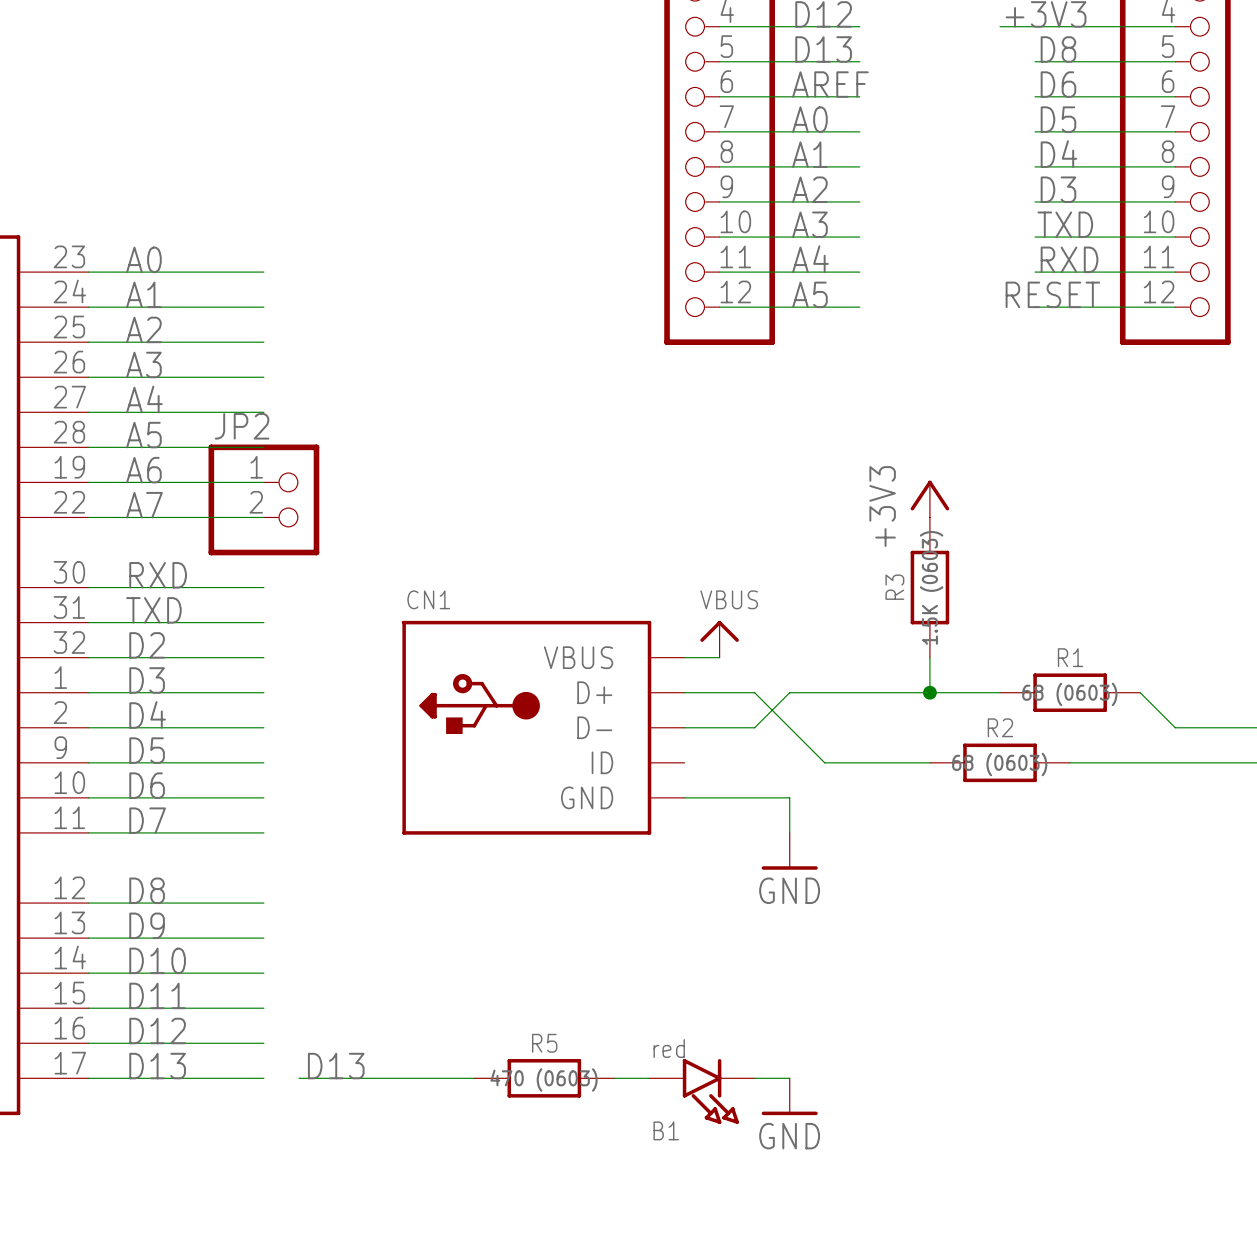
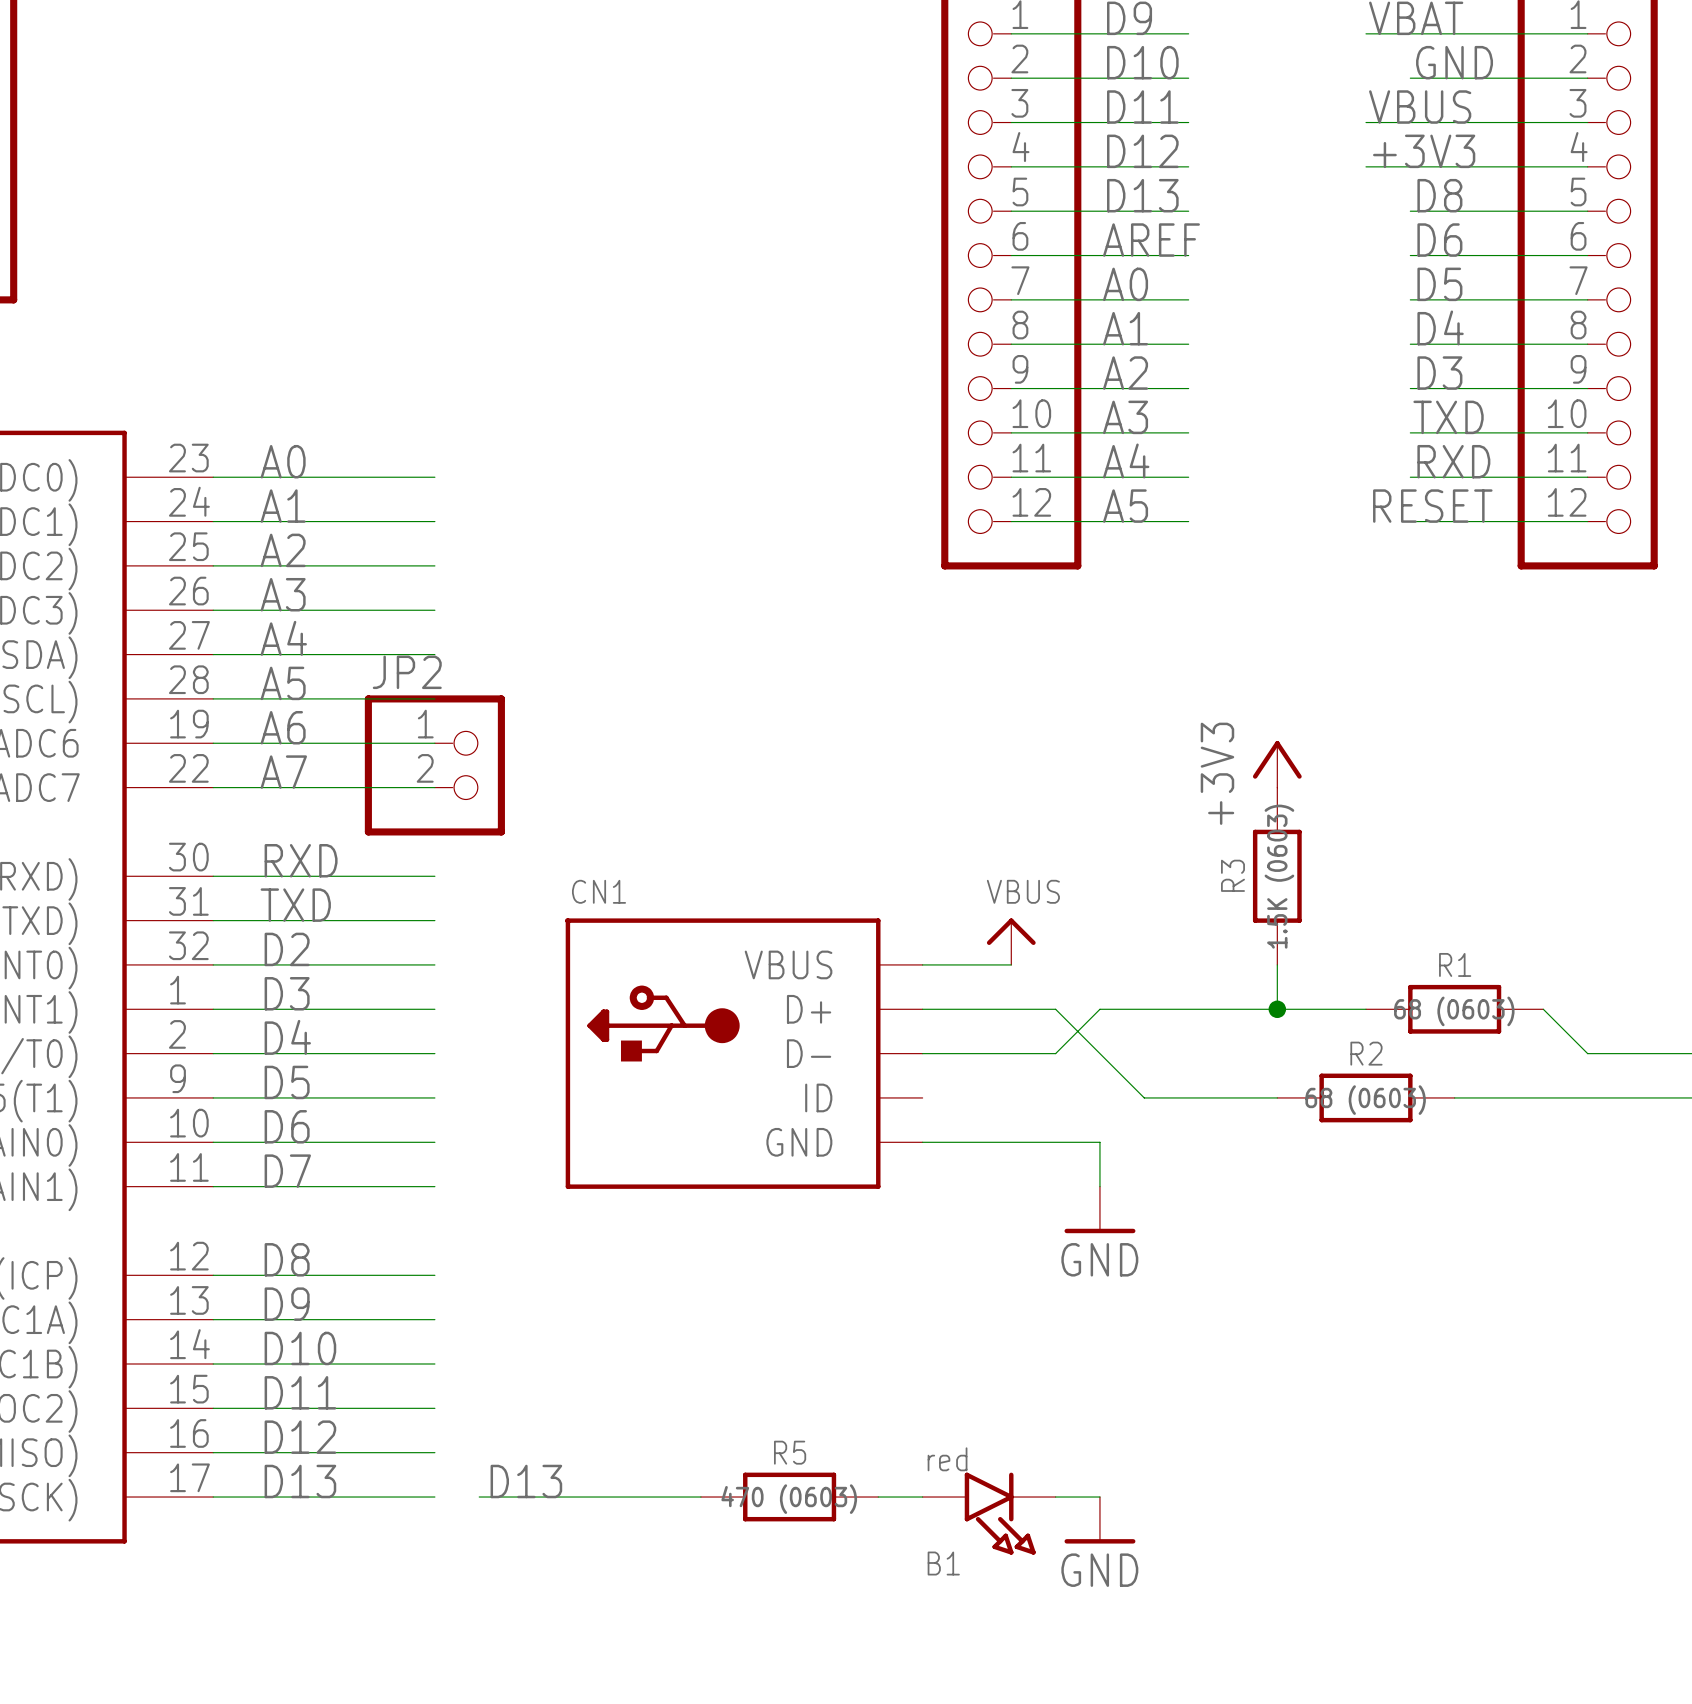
CN1 position: (543, 727) -> (743, 1053)

